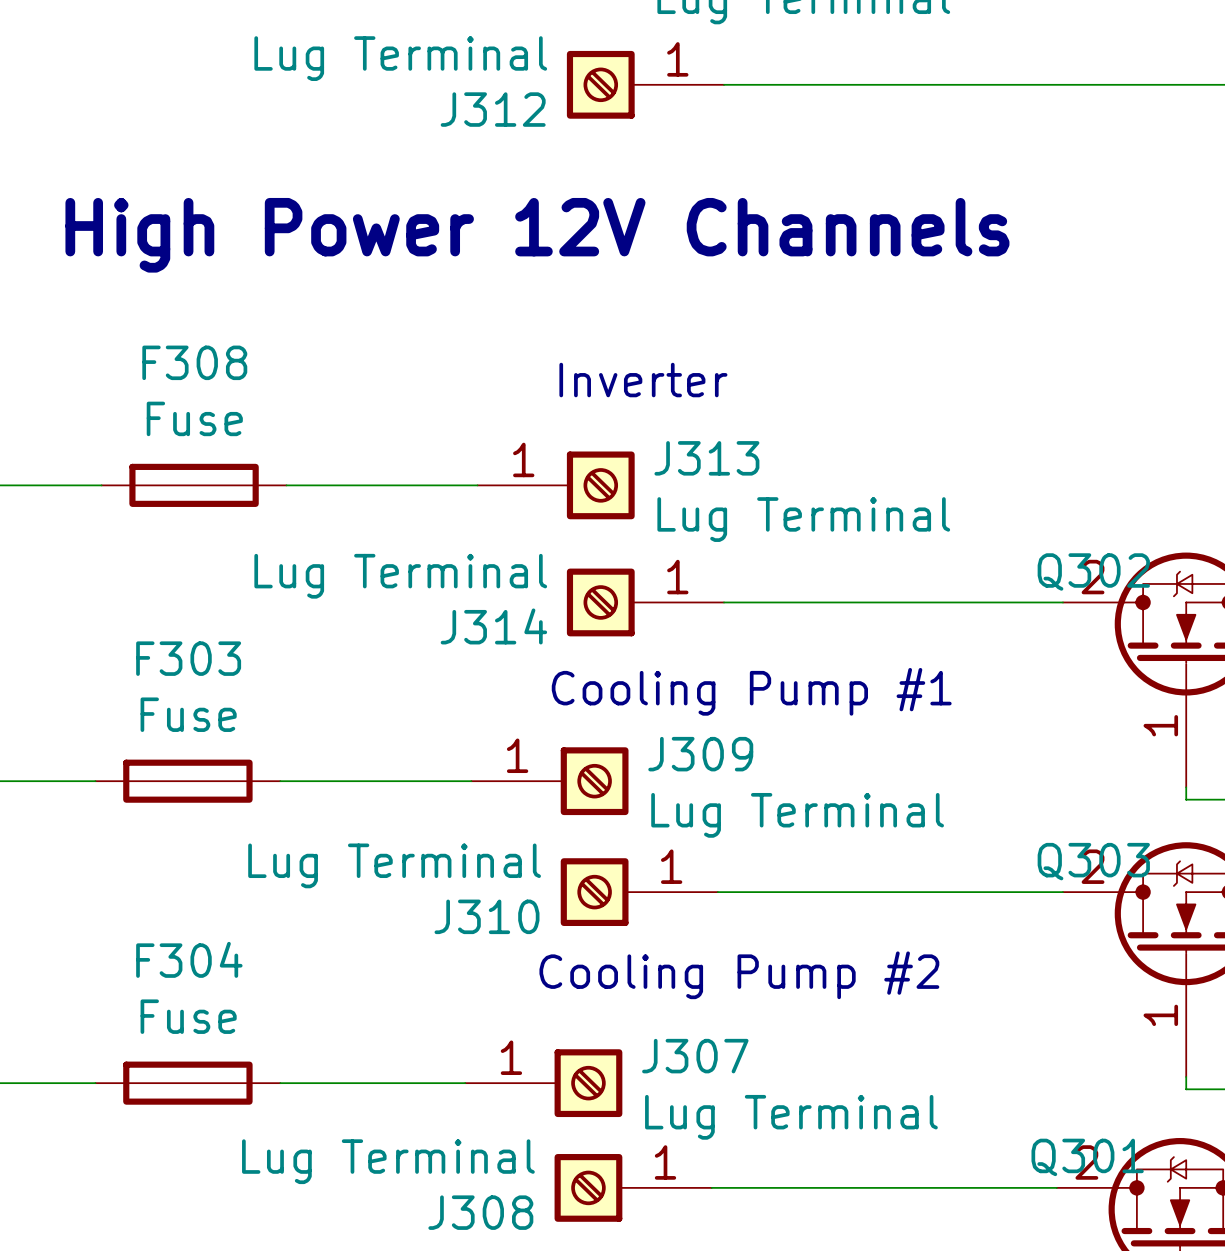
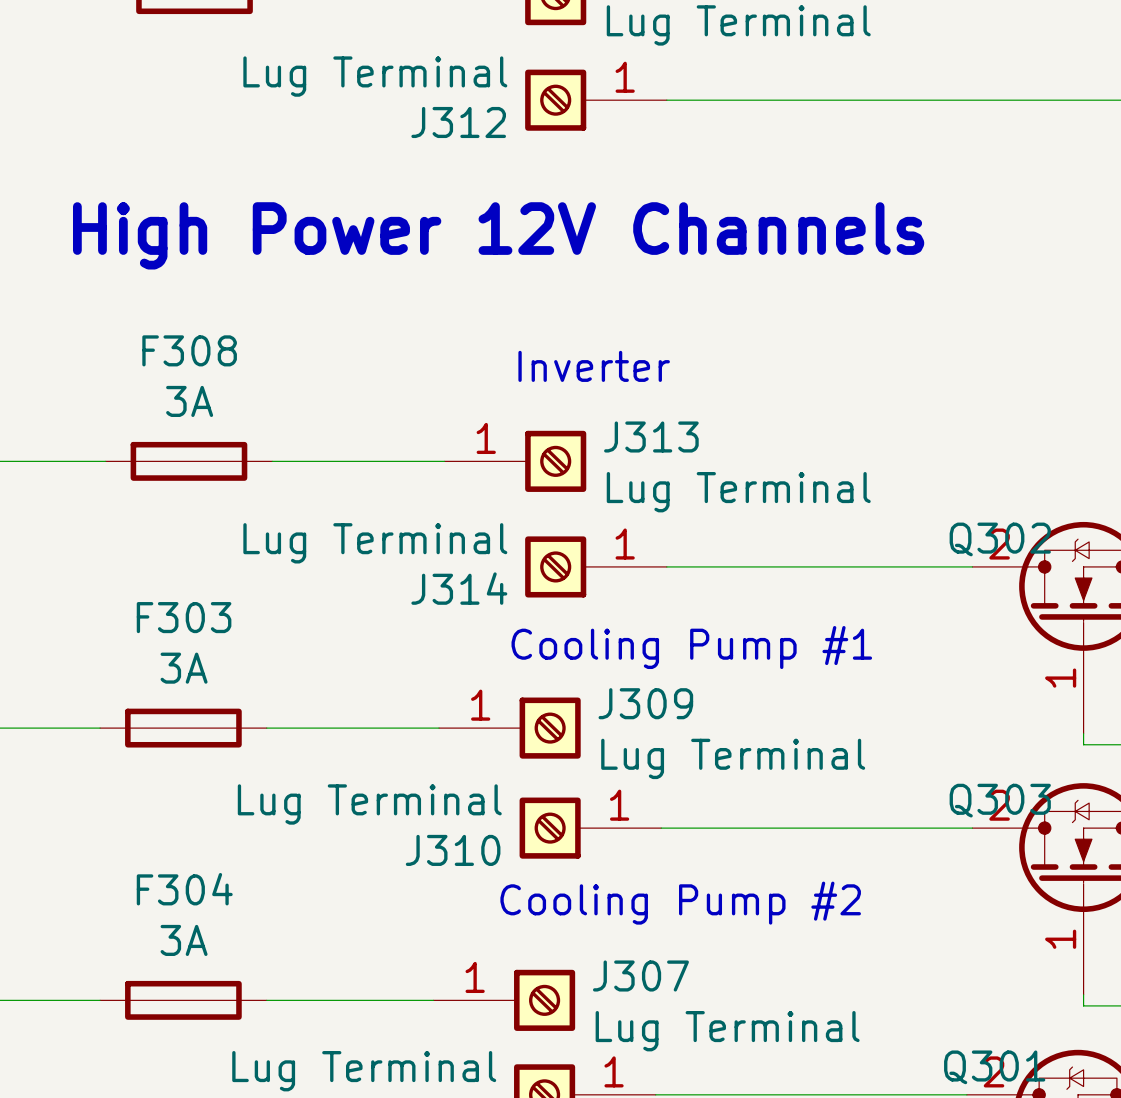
F308 value: Fuse (194, 418) -> 3A (189, 401)
F303 value: Fuse (188, 714) -> 3A (184, 668)
F304 value: Fuse (188, 1016) -> 3A (184, 940)

